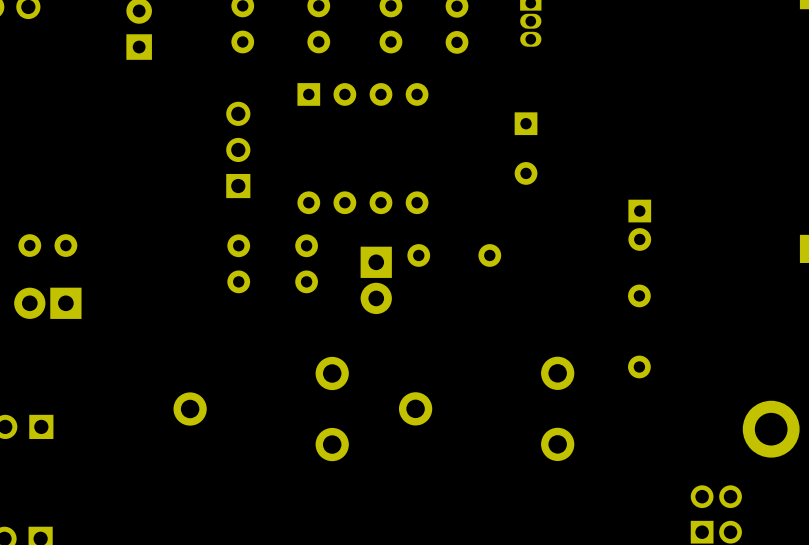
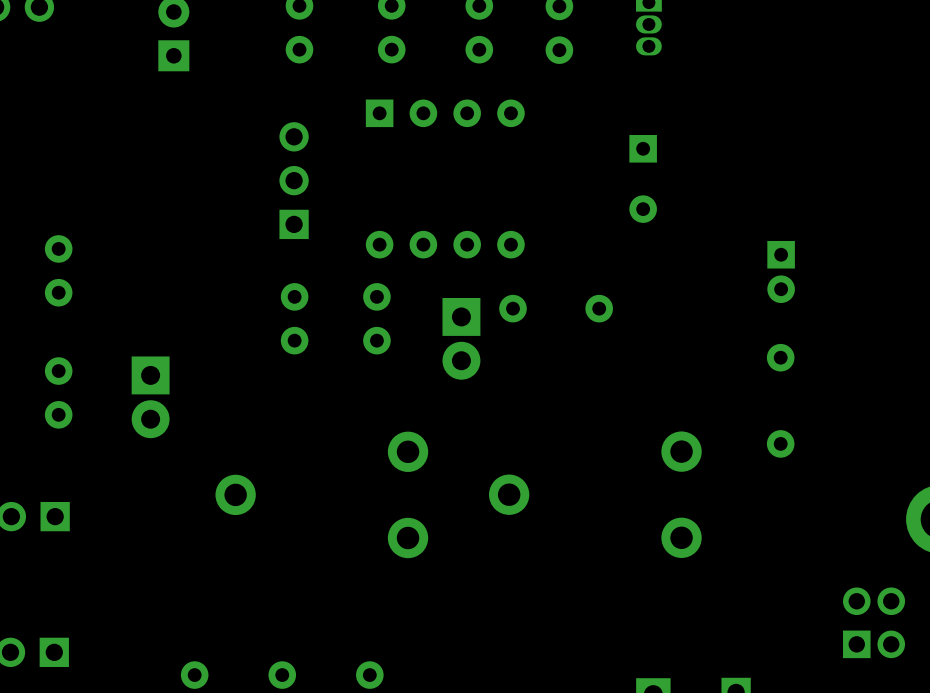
part rotation: 0° (47, 245) -> 90° clockwise (58, 270)
part rotation: 0° (47, 303) -> 90° counterclockwise (150, 397)
part position: (47, 303) -> (150, 397)
part: none -> (58, 392)

